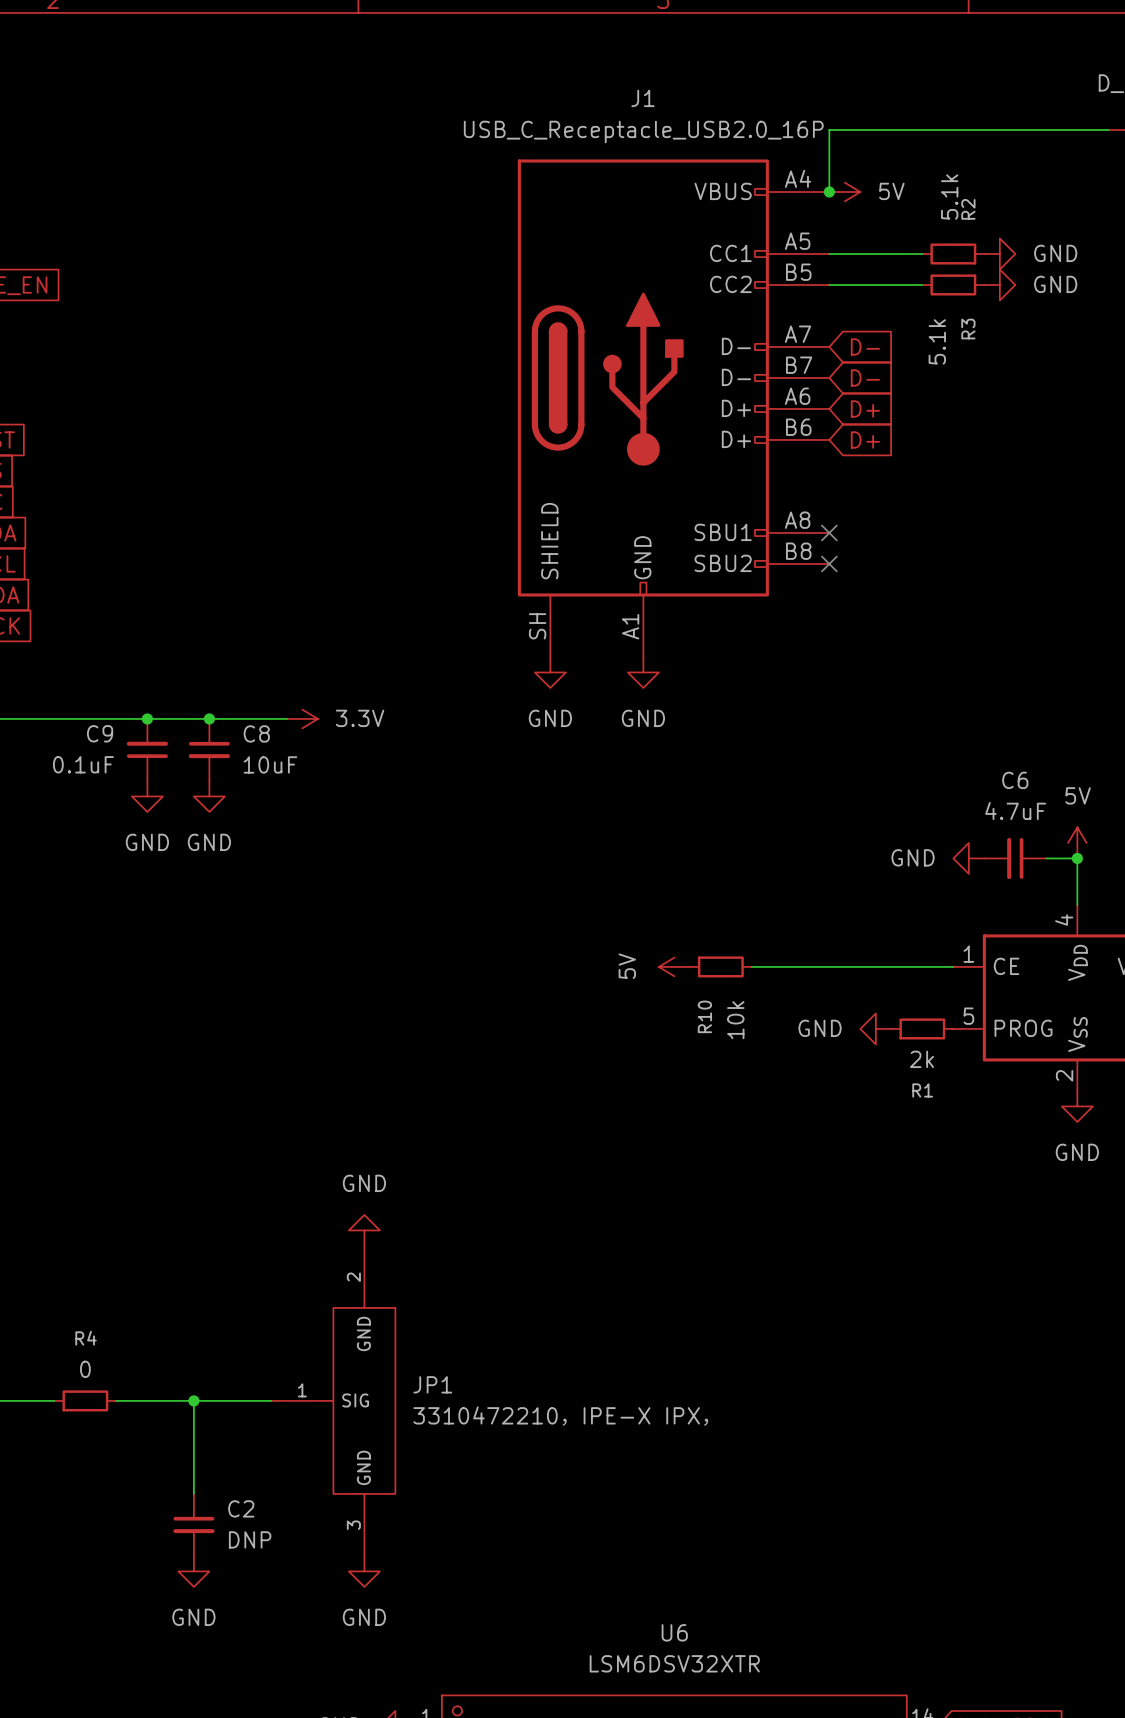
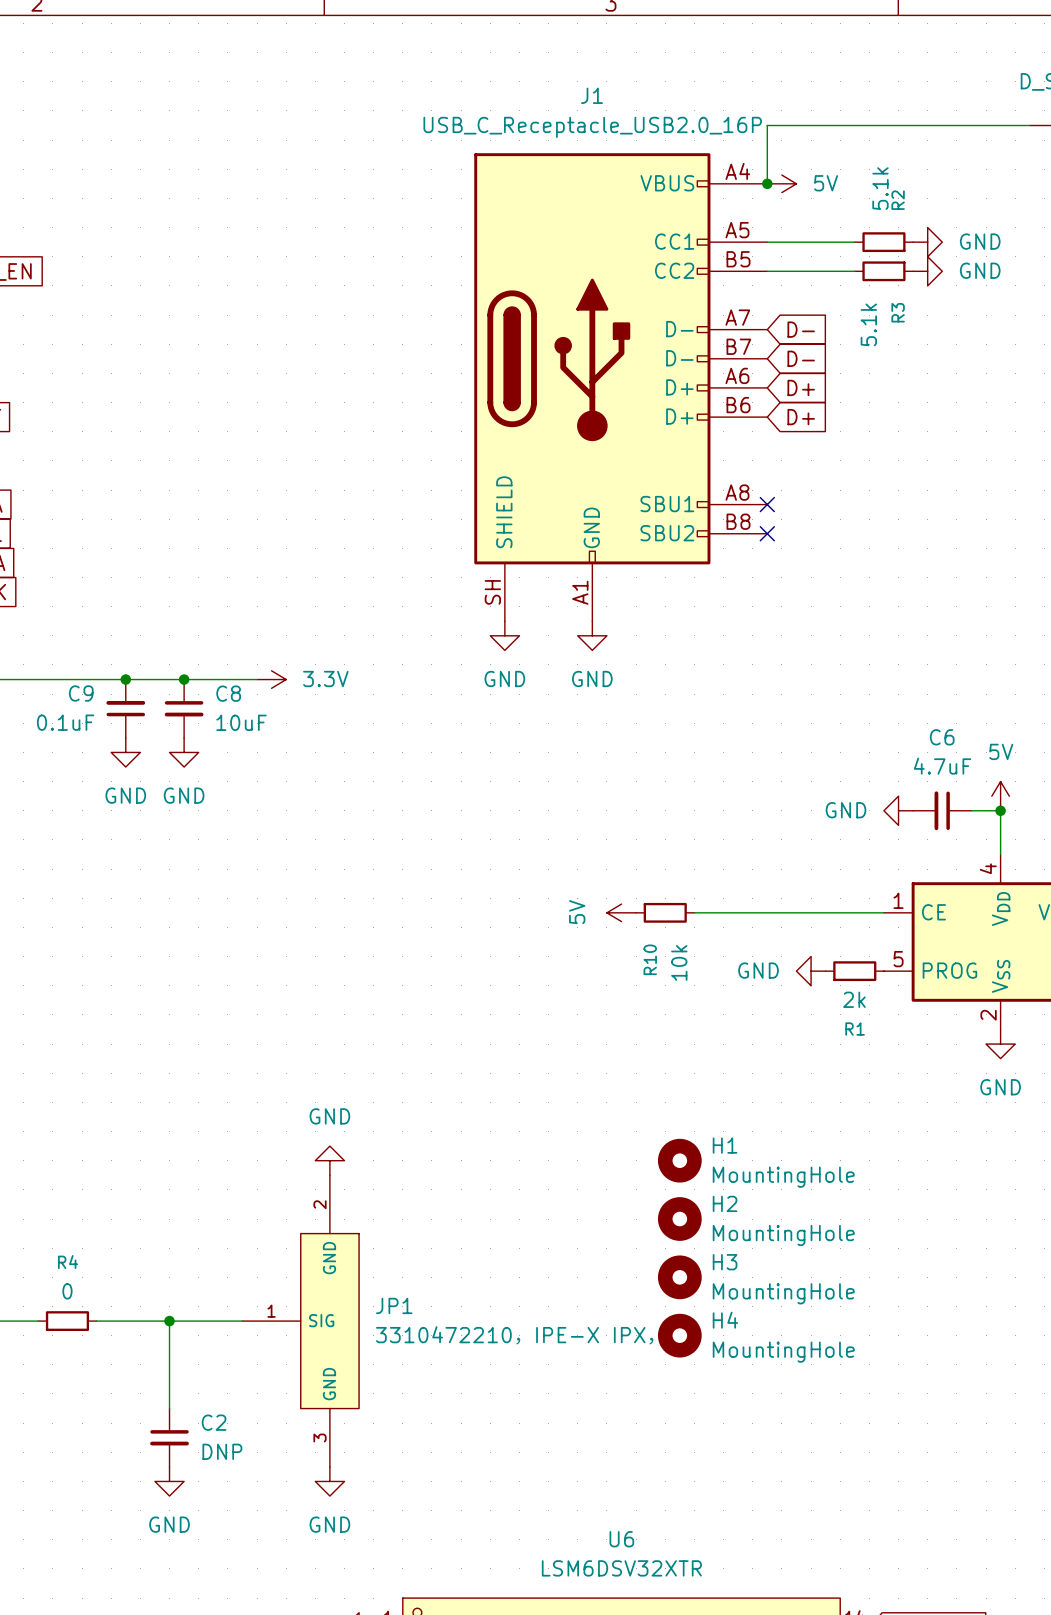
H1: none -> MountingHole (679, 1160)
H2: none -> MountingHole (679, 1219)
H3: none -> MountingHole (679, 1277)
H4: none -> MountingHole (679, 1335)

